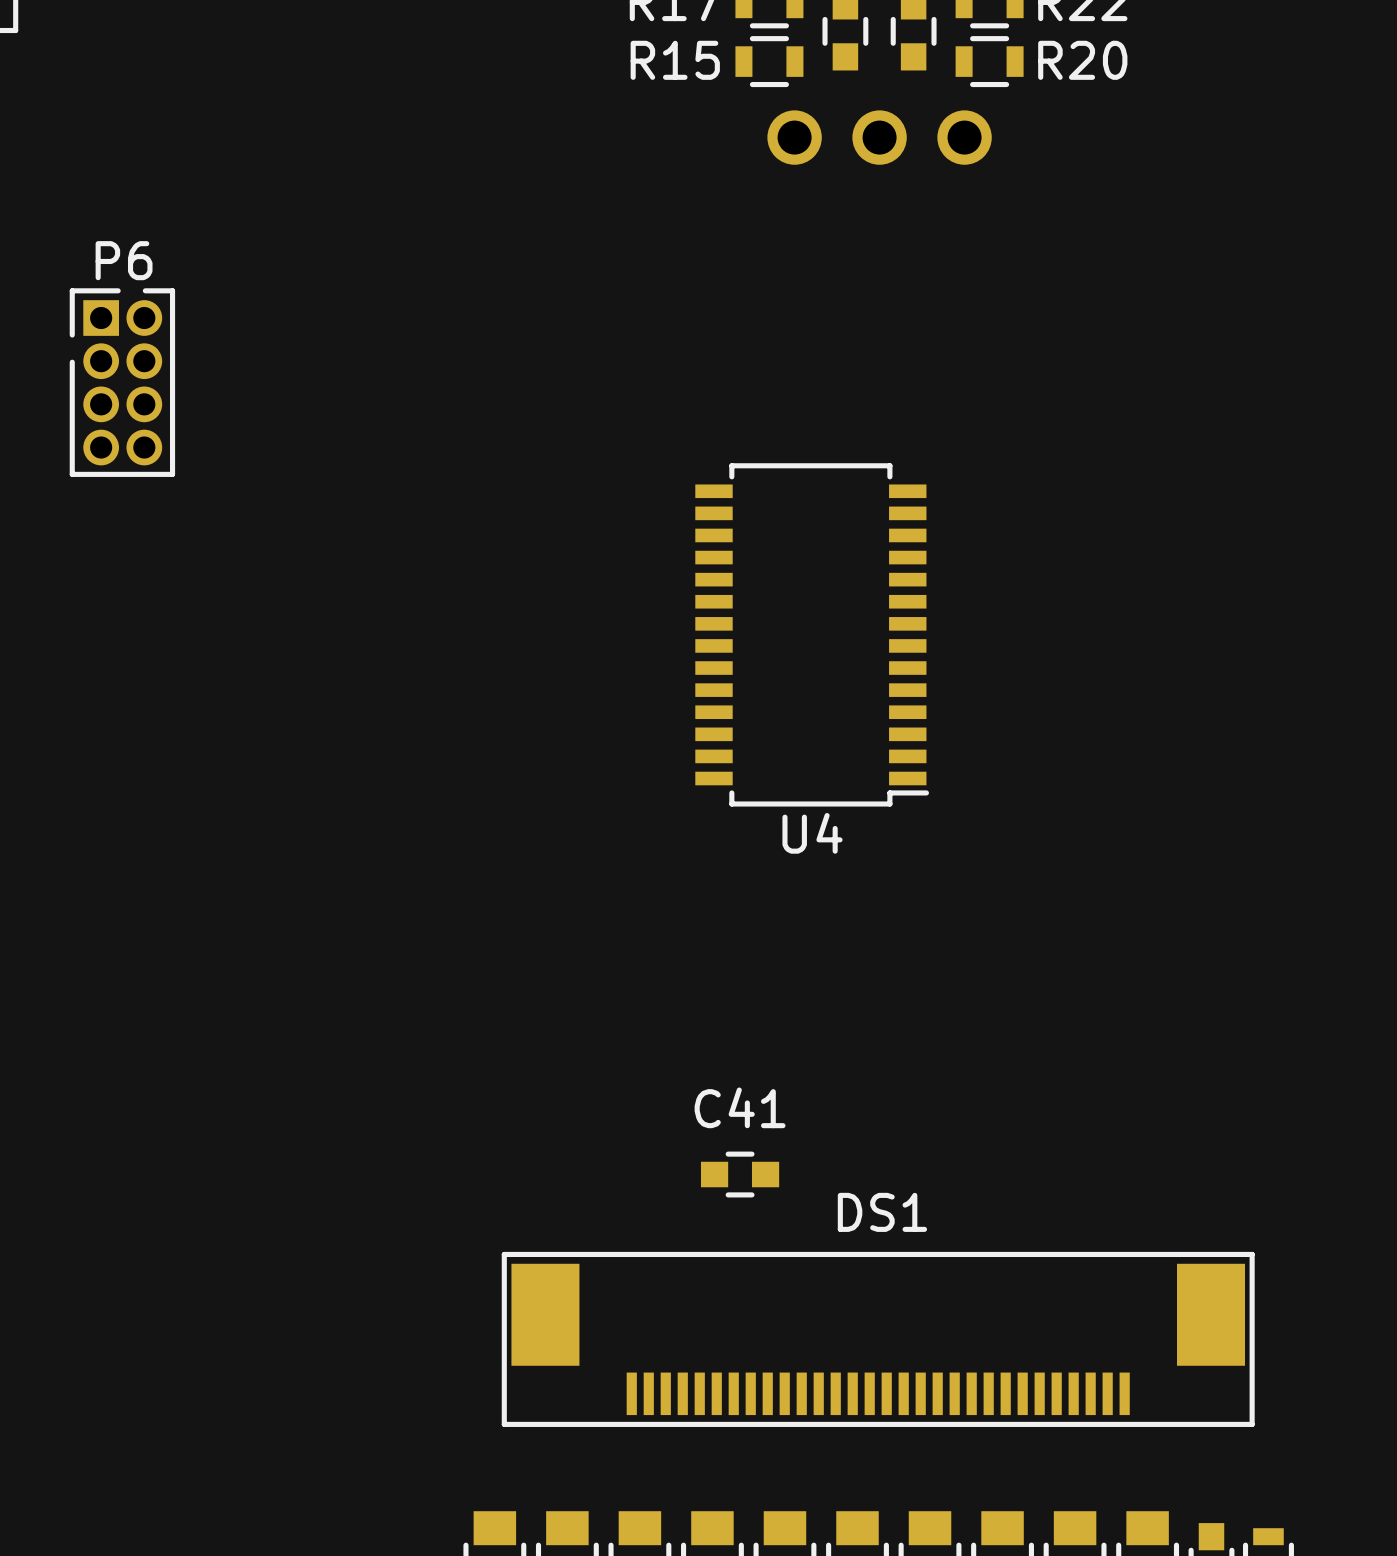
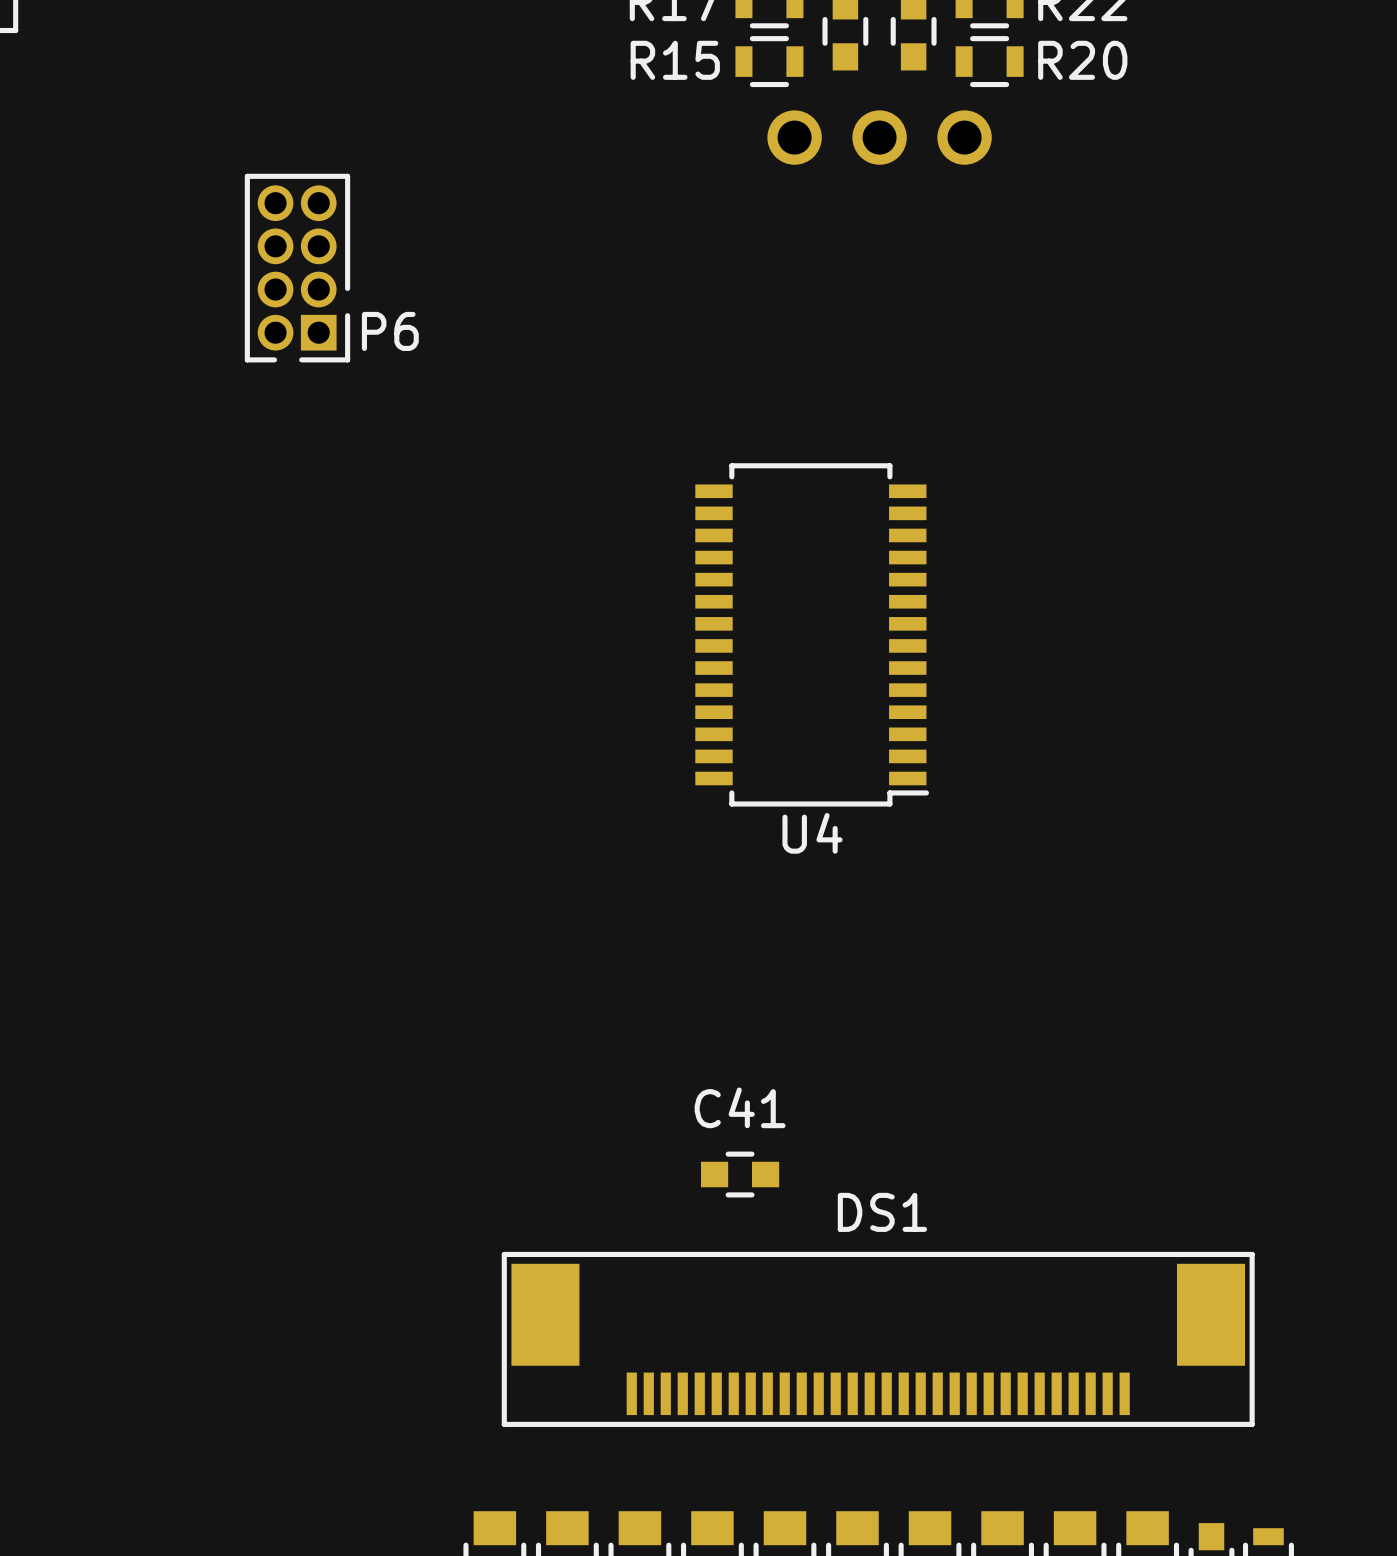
P6 name position: P6 (124, 260) -> P6 (390, 331)
P6 rotation: 0° (122, 382) -> 180° (297, 268)
P6 position: (122, 382) -> (297, 268)

